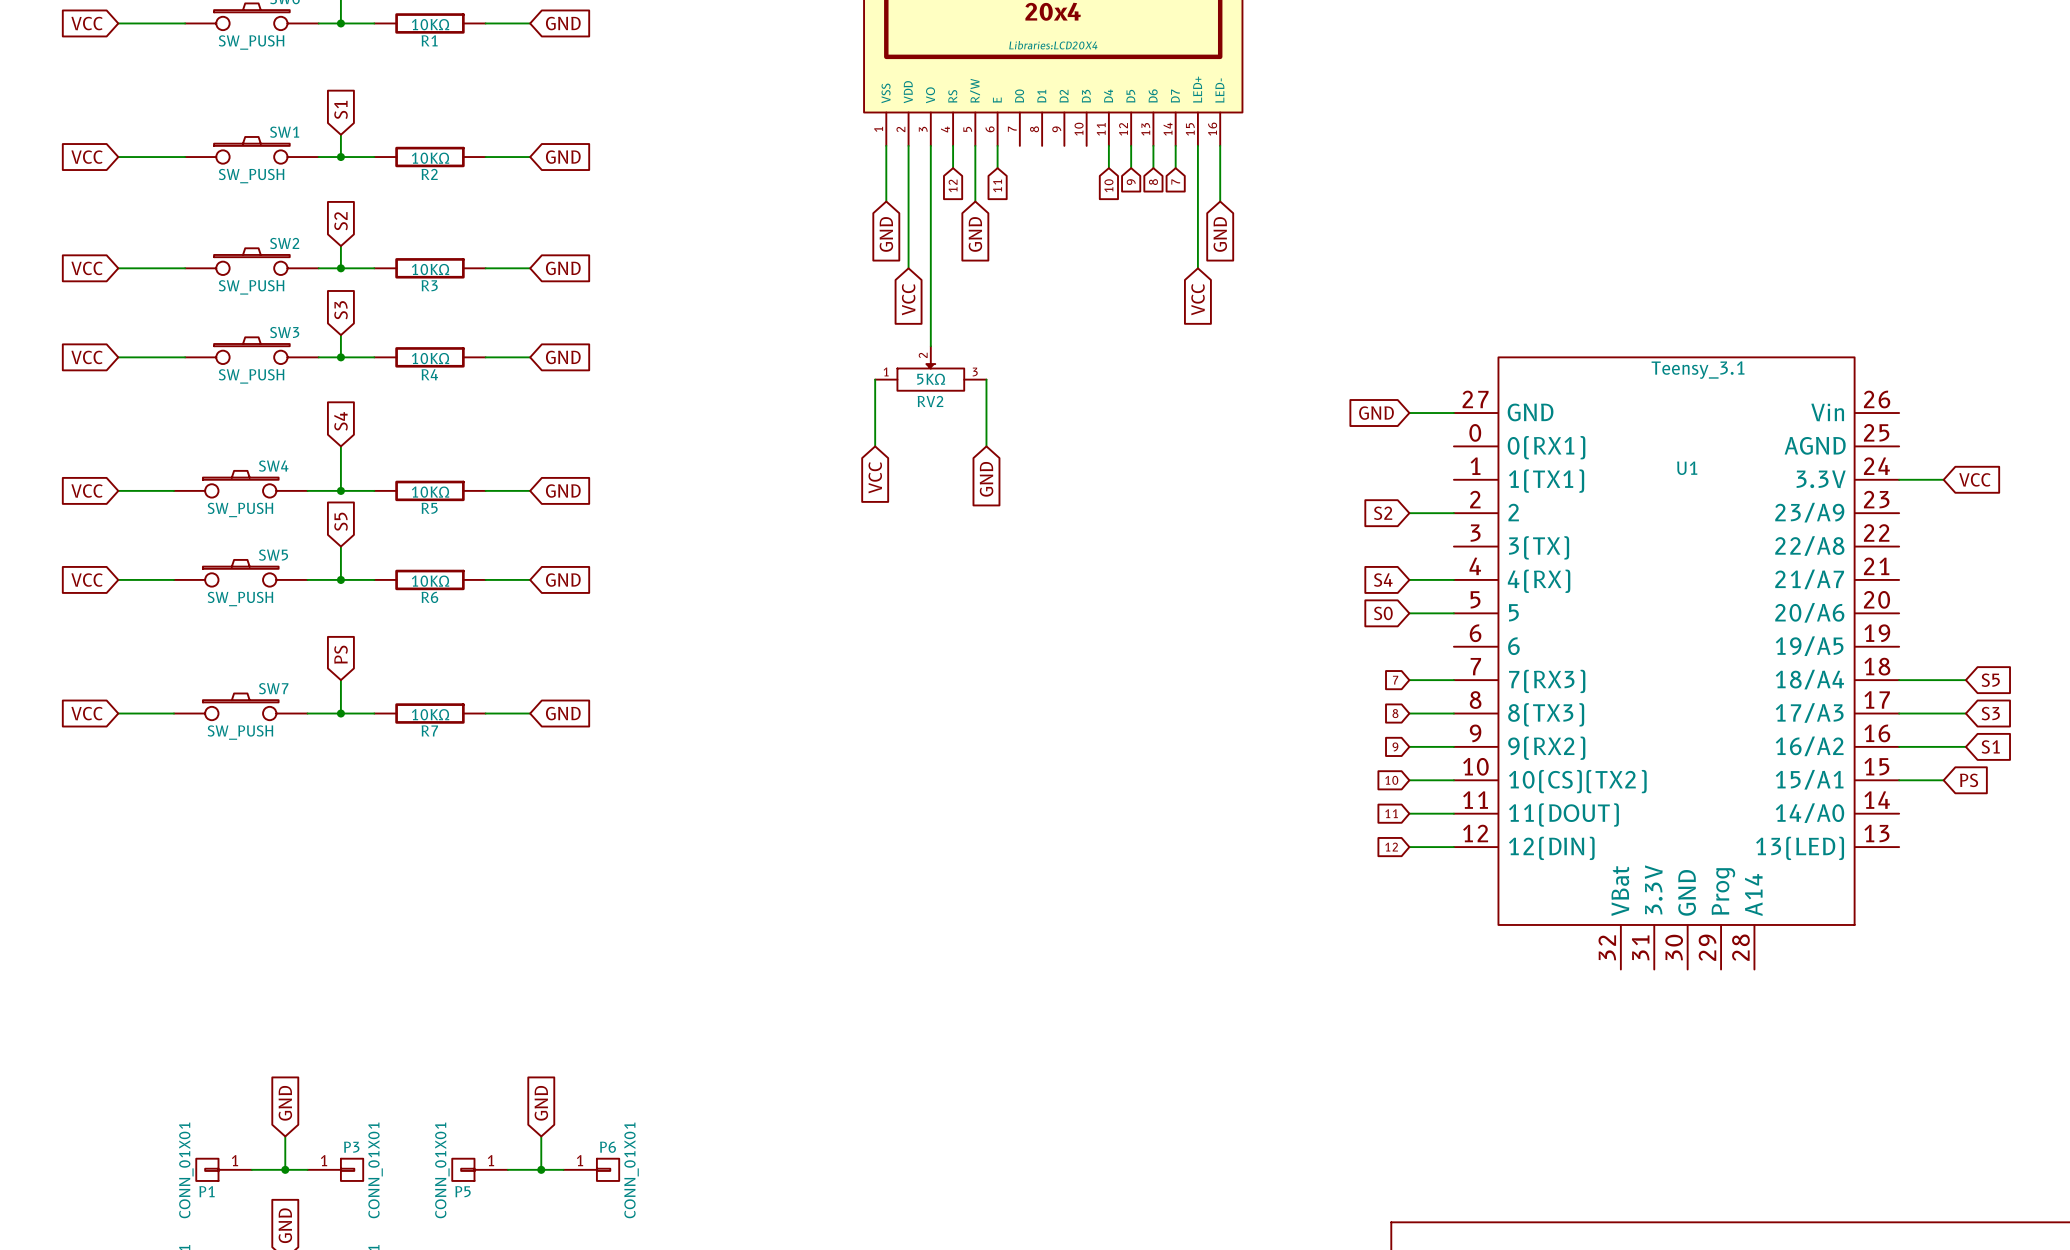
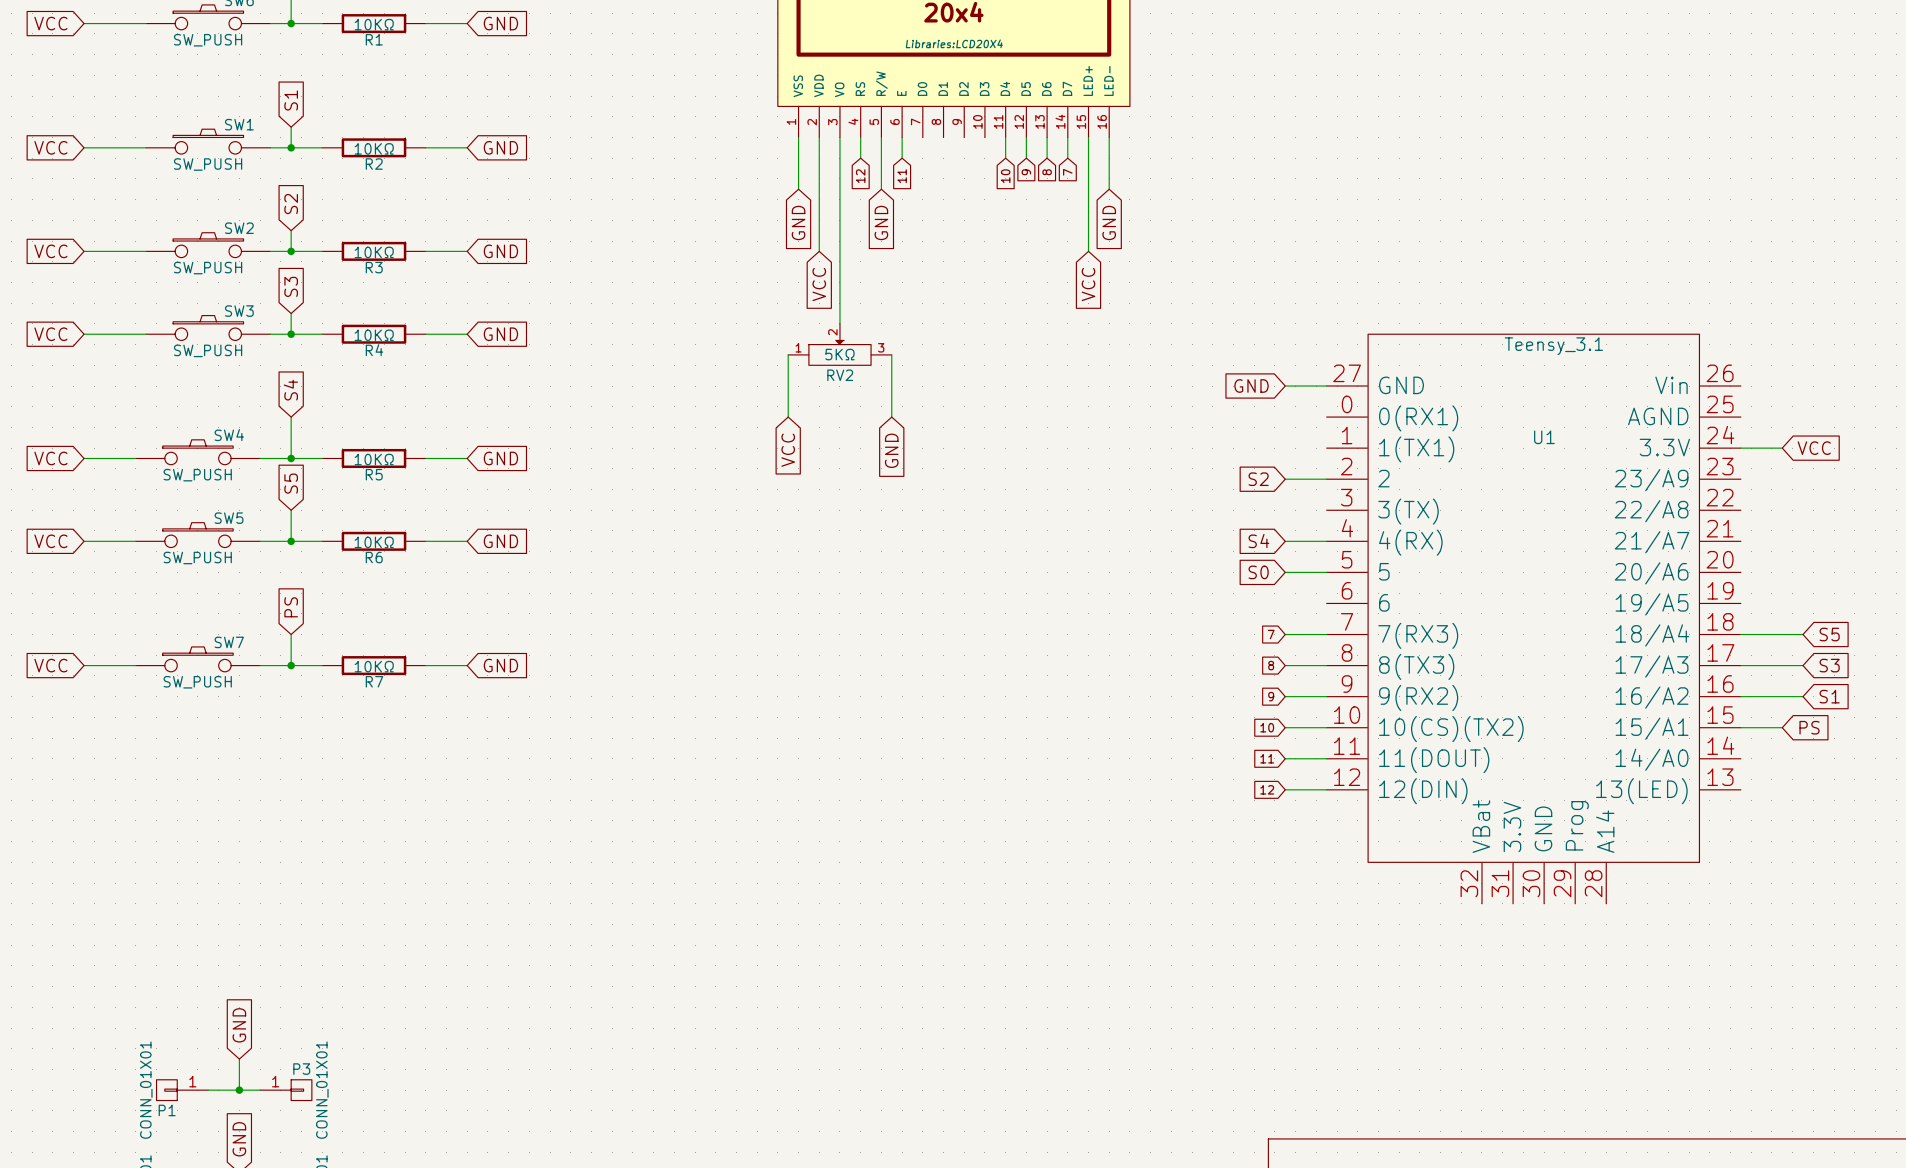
global label: GND (541, 1103) -> none
wire: (541, 1136) (541, 1169) -> none
P5: CONN_01X01 (480, 1169) -> none
wire: (507, 1169) (563, 1169) -> none
junction: (541, 1169) -> none
P6: CONN_01X01 (591, 1169) -> none

